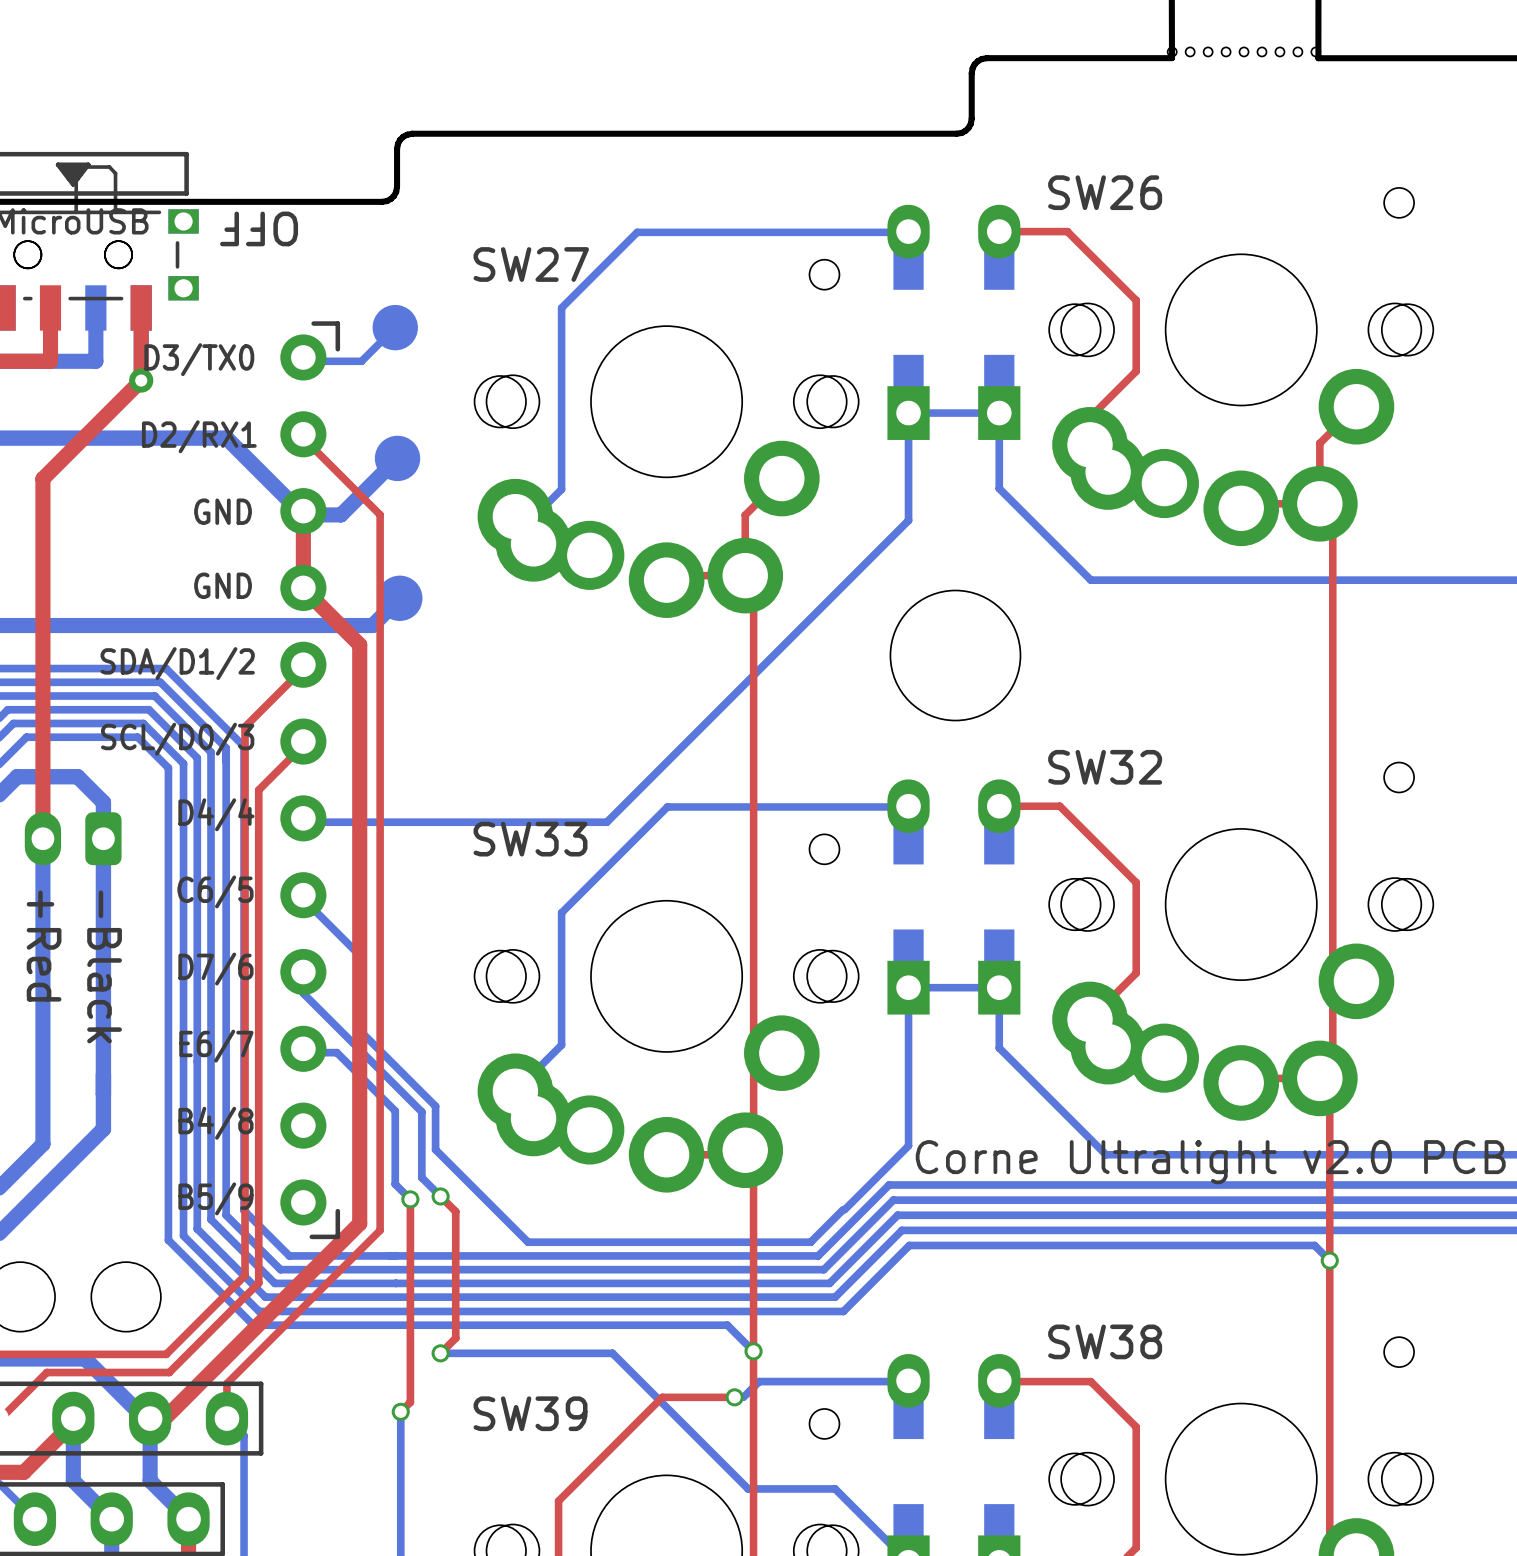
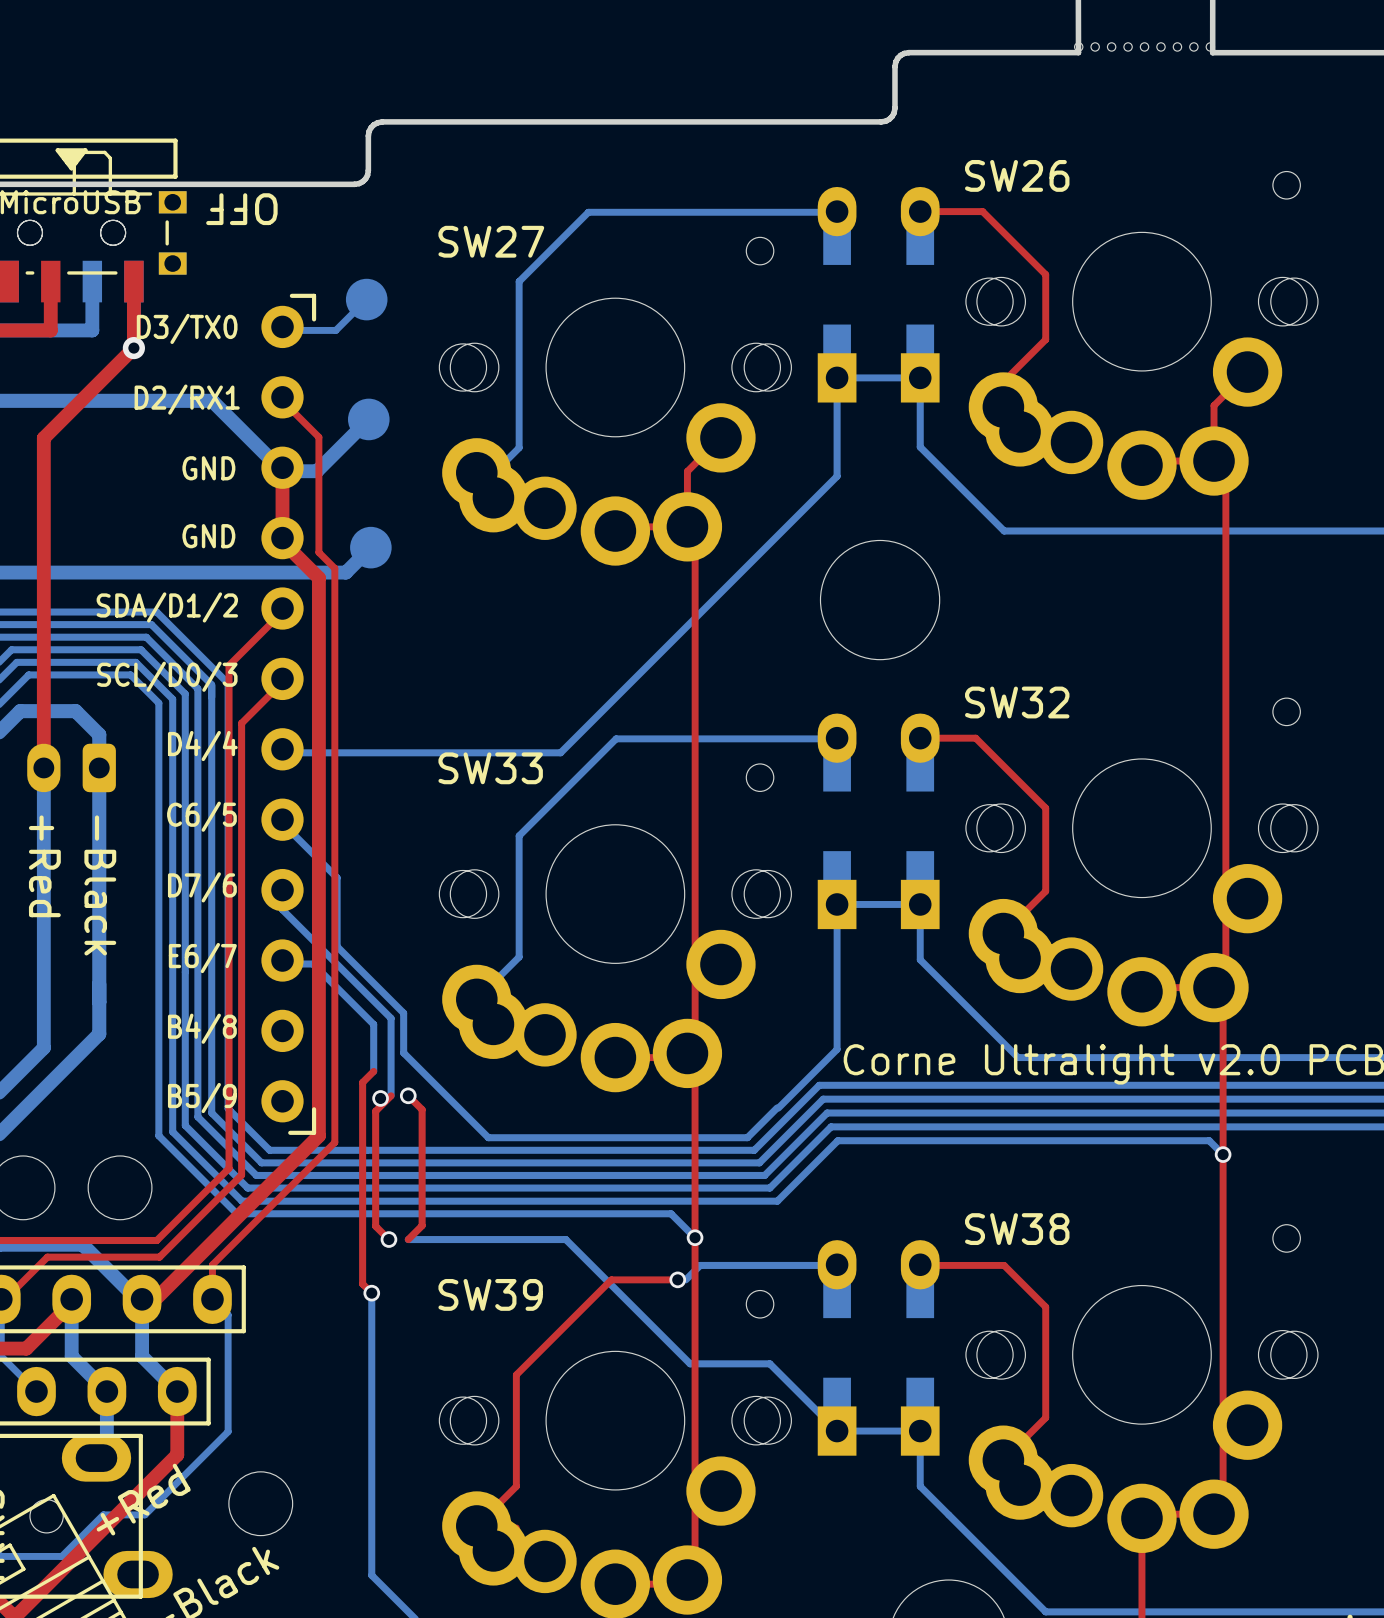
top track: (343, 477) (380, 514) (380, 1230) (226, 1383) -> (318, 437) (318, 552) (334, 568) (334, 1142) (212, 1264) (212, 1267)
top track: (303, 588) (359, 644) (359, 1223) (343, 1240) -> (282, 538) (282, 541) (318, 578) (318, 1135)
bottom track: (395, 1111) (395, 1184) (410, 1199) -> (366, 1017) (373, 1024) (373, 1071)
bottom track: (421, 1177) (440, 1196) -> (391, 1078) (391, 1095)
top track: none -> (391, 1095) (375, 1111) (375, 1226) (388, 1239)
top track: (410, 1199) (410, 1402) (400, 1411) -> (373, 1071) (362, 1082) (362, 1284) (371, 1293)
via position: (440, 1353) -> (388, 1239)

